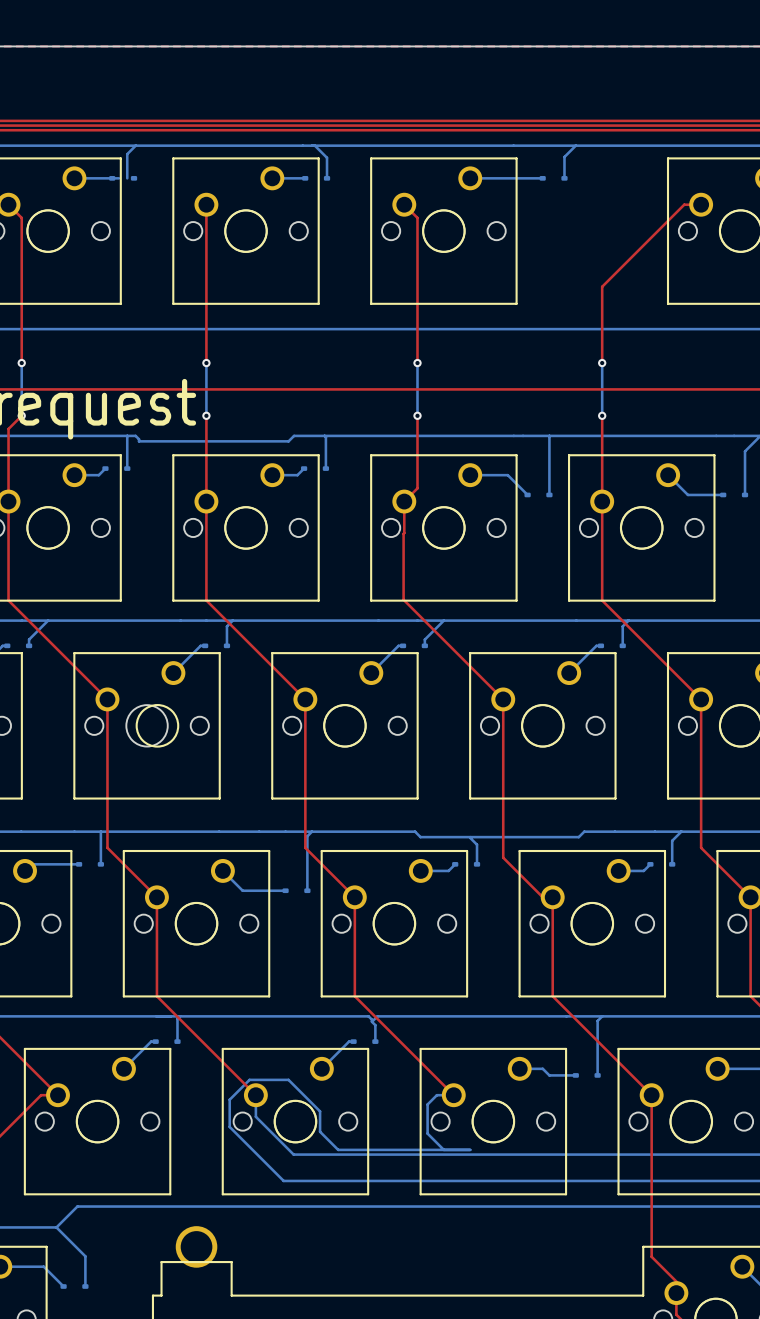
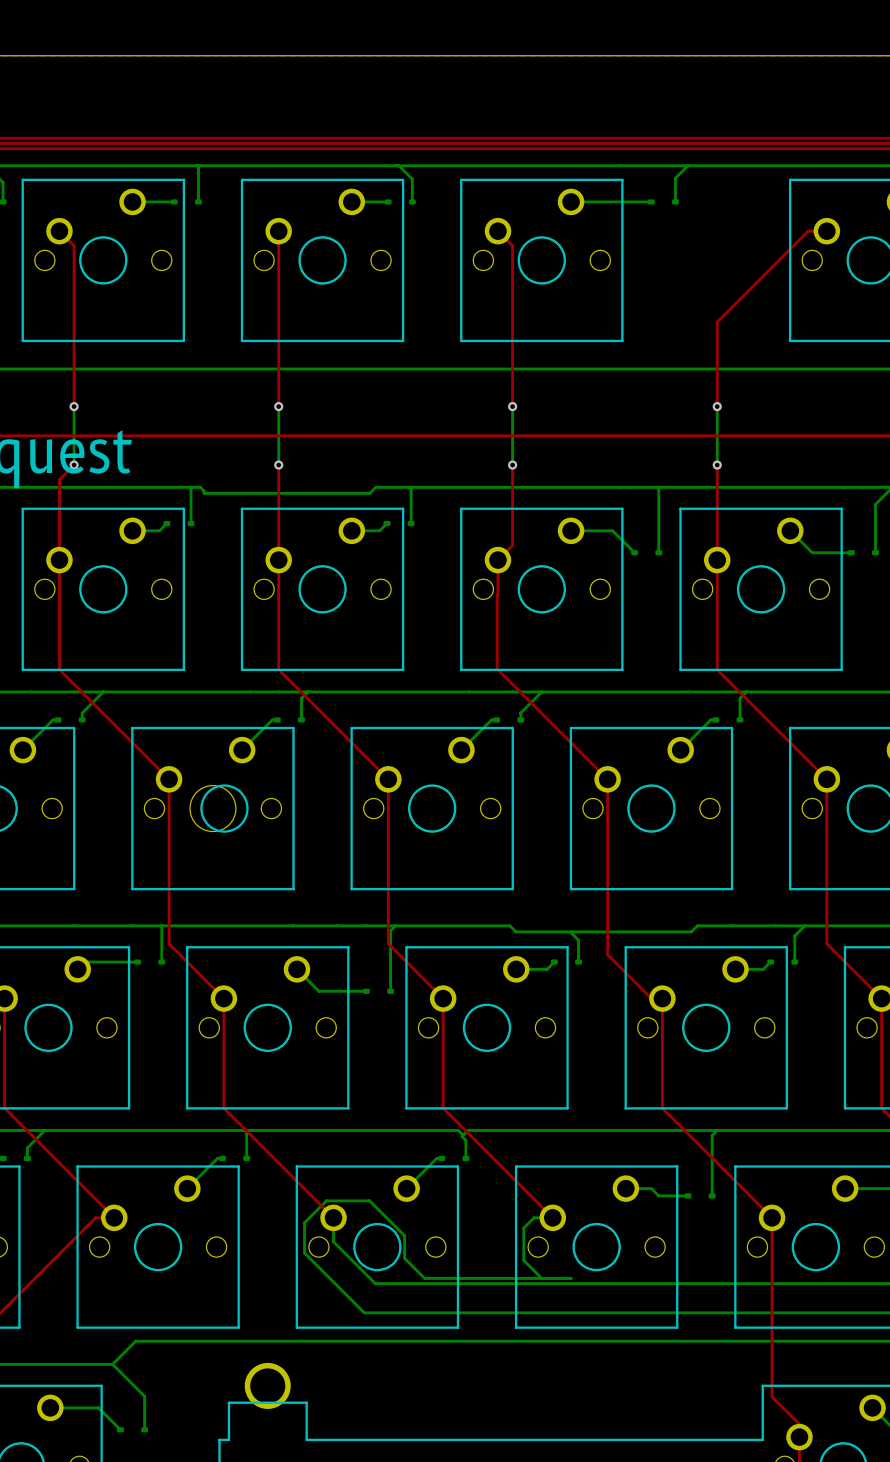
bottom track: none -> (197, 165) (198, 201)
bottom track: (135, 145) (127, 154) (127, 178) -> none
bottom track: (112, 178) (118, 178) -> none

